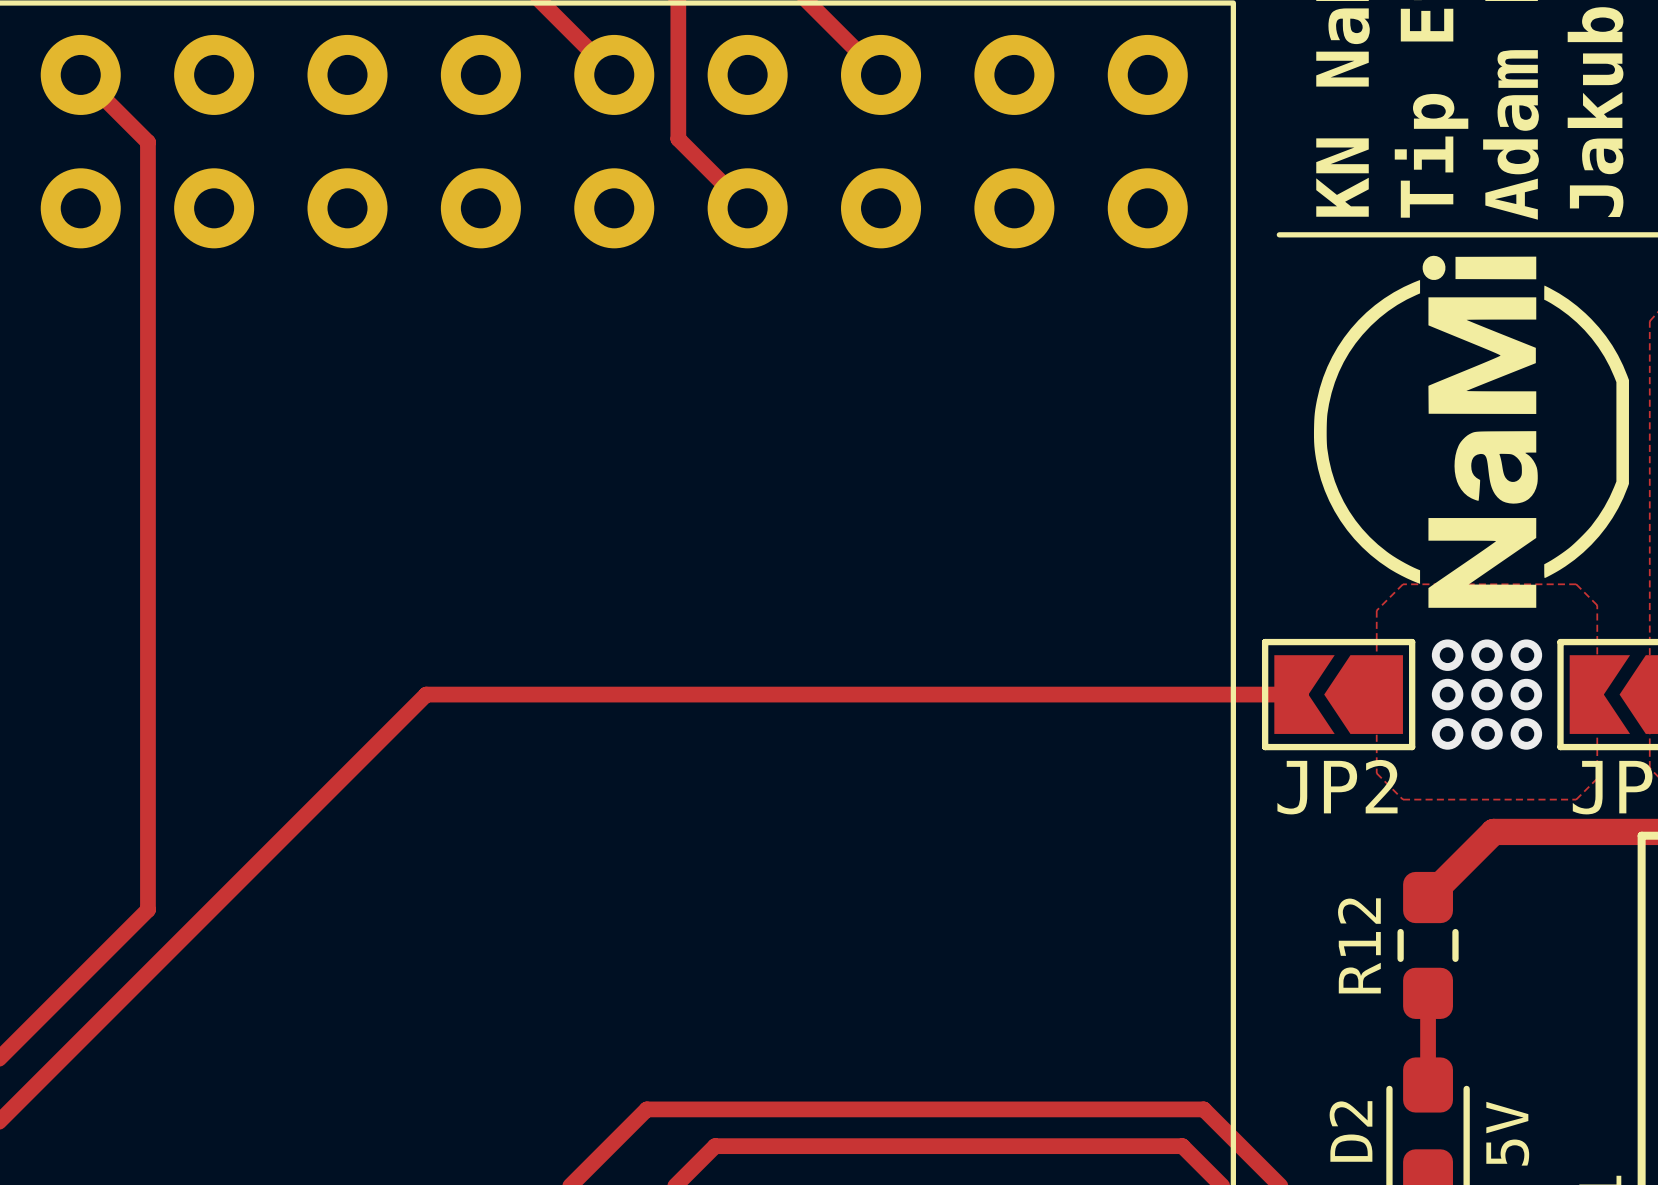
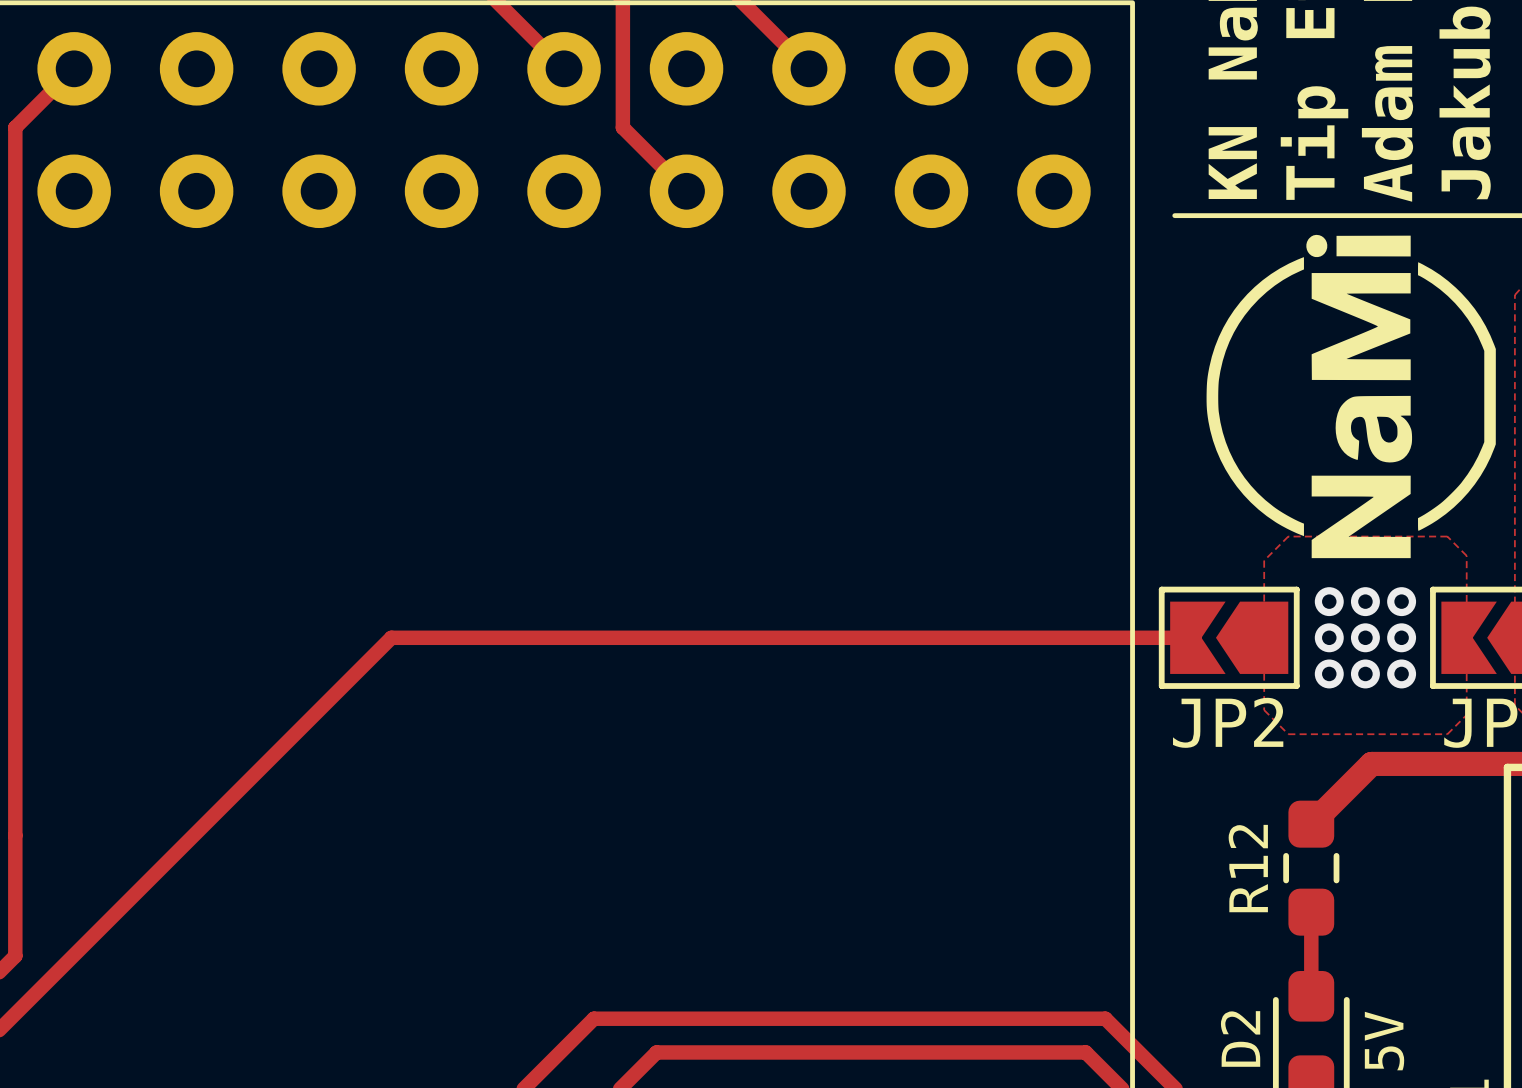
track: (80, 74) (147, 142) (147, 909) (16, 1041) -> (74, 68) (15, 127) (15, 956)

